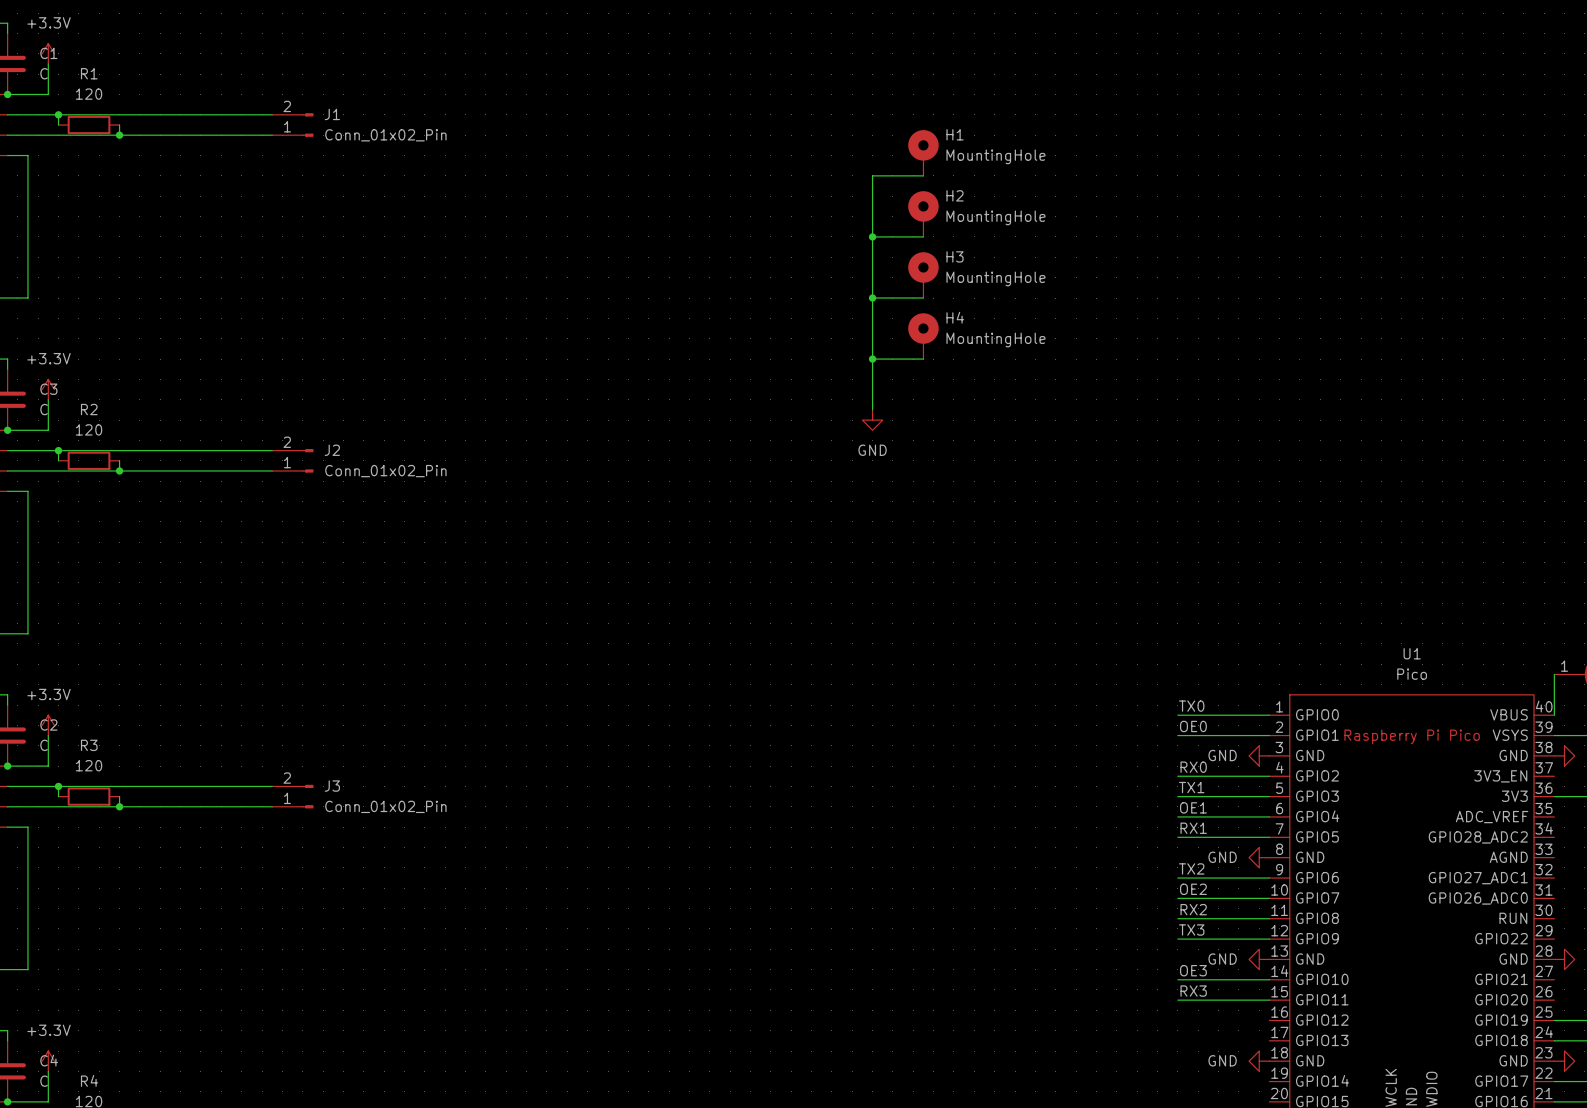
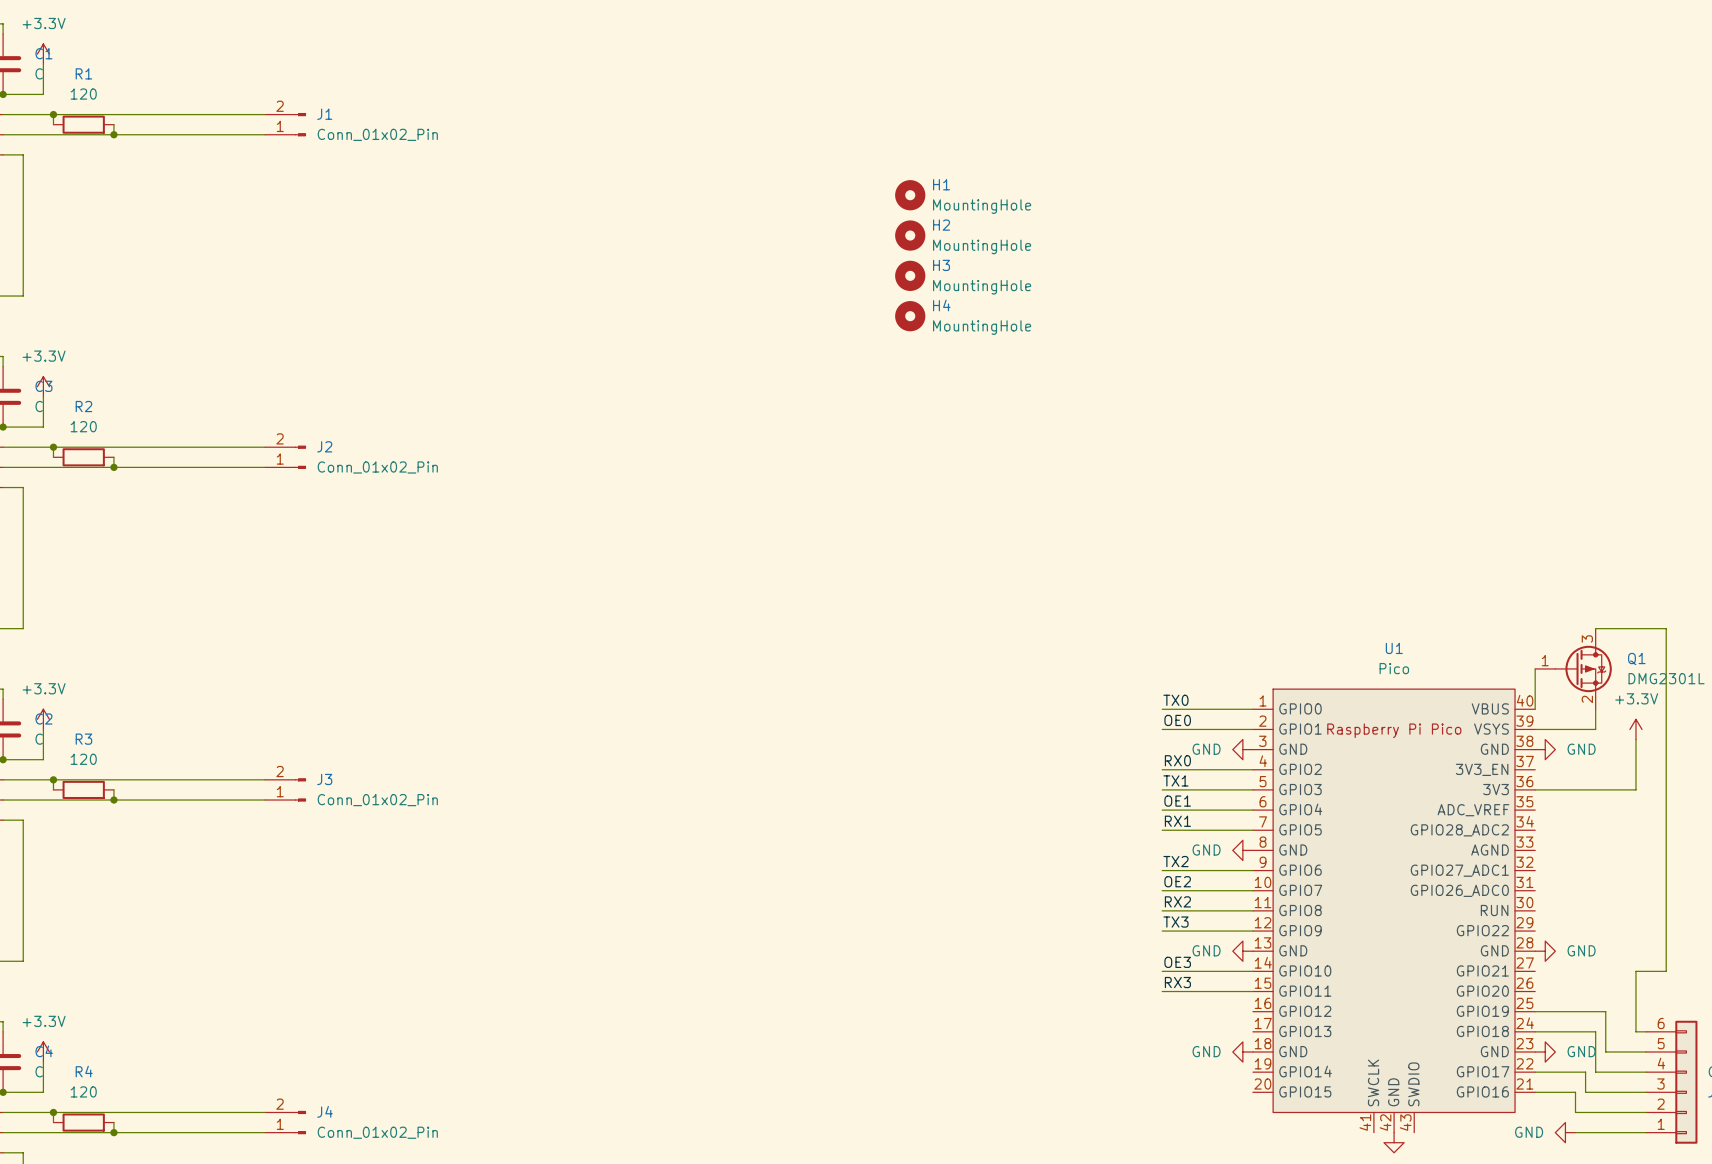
H1 symbol: [908, 130, 939, 176] -> [895, 180, 926, 211]
wire: (923, 175) (872, 175) (872, 409) -> none
H2 symbol: [908, 191, 939, 237] -> [895, 220, 926, 251]
wire: (872, 236) (923, 236) -> none
junction: (872, 236) -> none
H3 symbol: [908, 252, 939, 299] -> [895, 260, 926, 291]
wire: (872, 298) (923, 298) -> none
junction: (872, 298) -> none
H4 symbol: [908, 313, 939, 360] -> [895, 301, 926, 332]
wire: (872, 359) (923, 359) -> none
junction: (872, 359) -> none
power symbol: GND (872, 420) -> none

